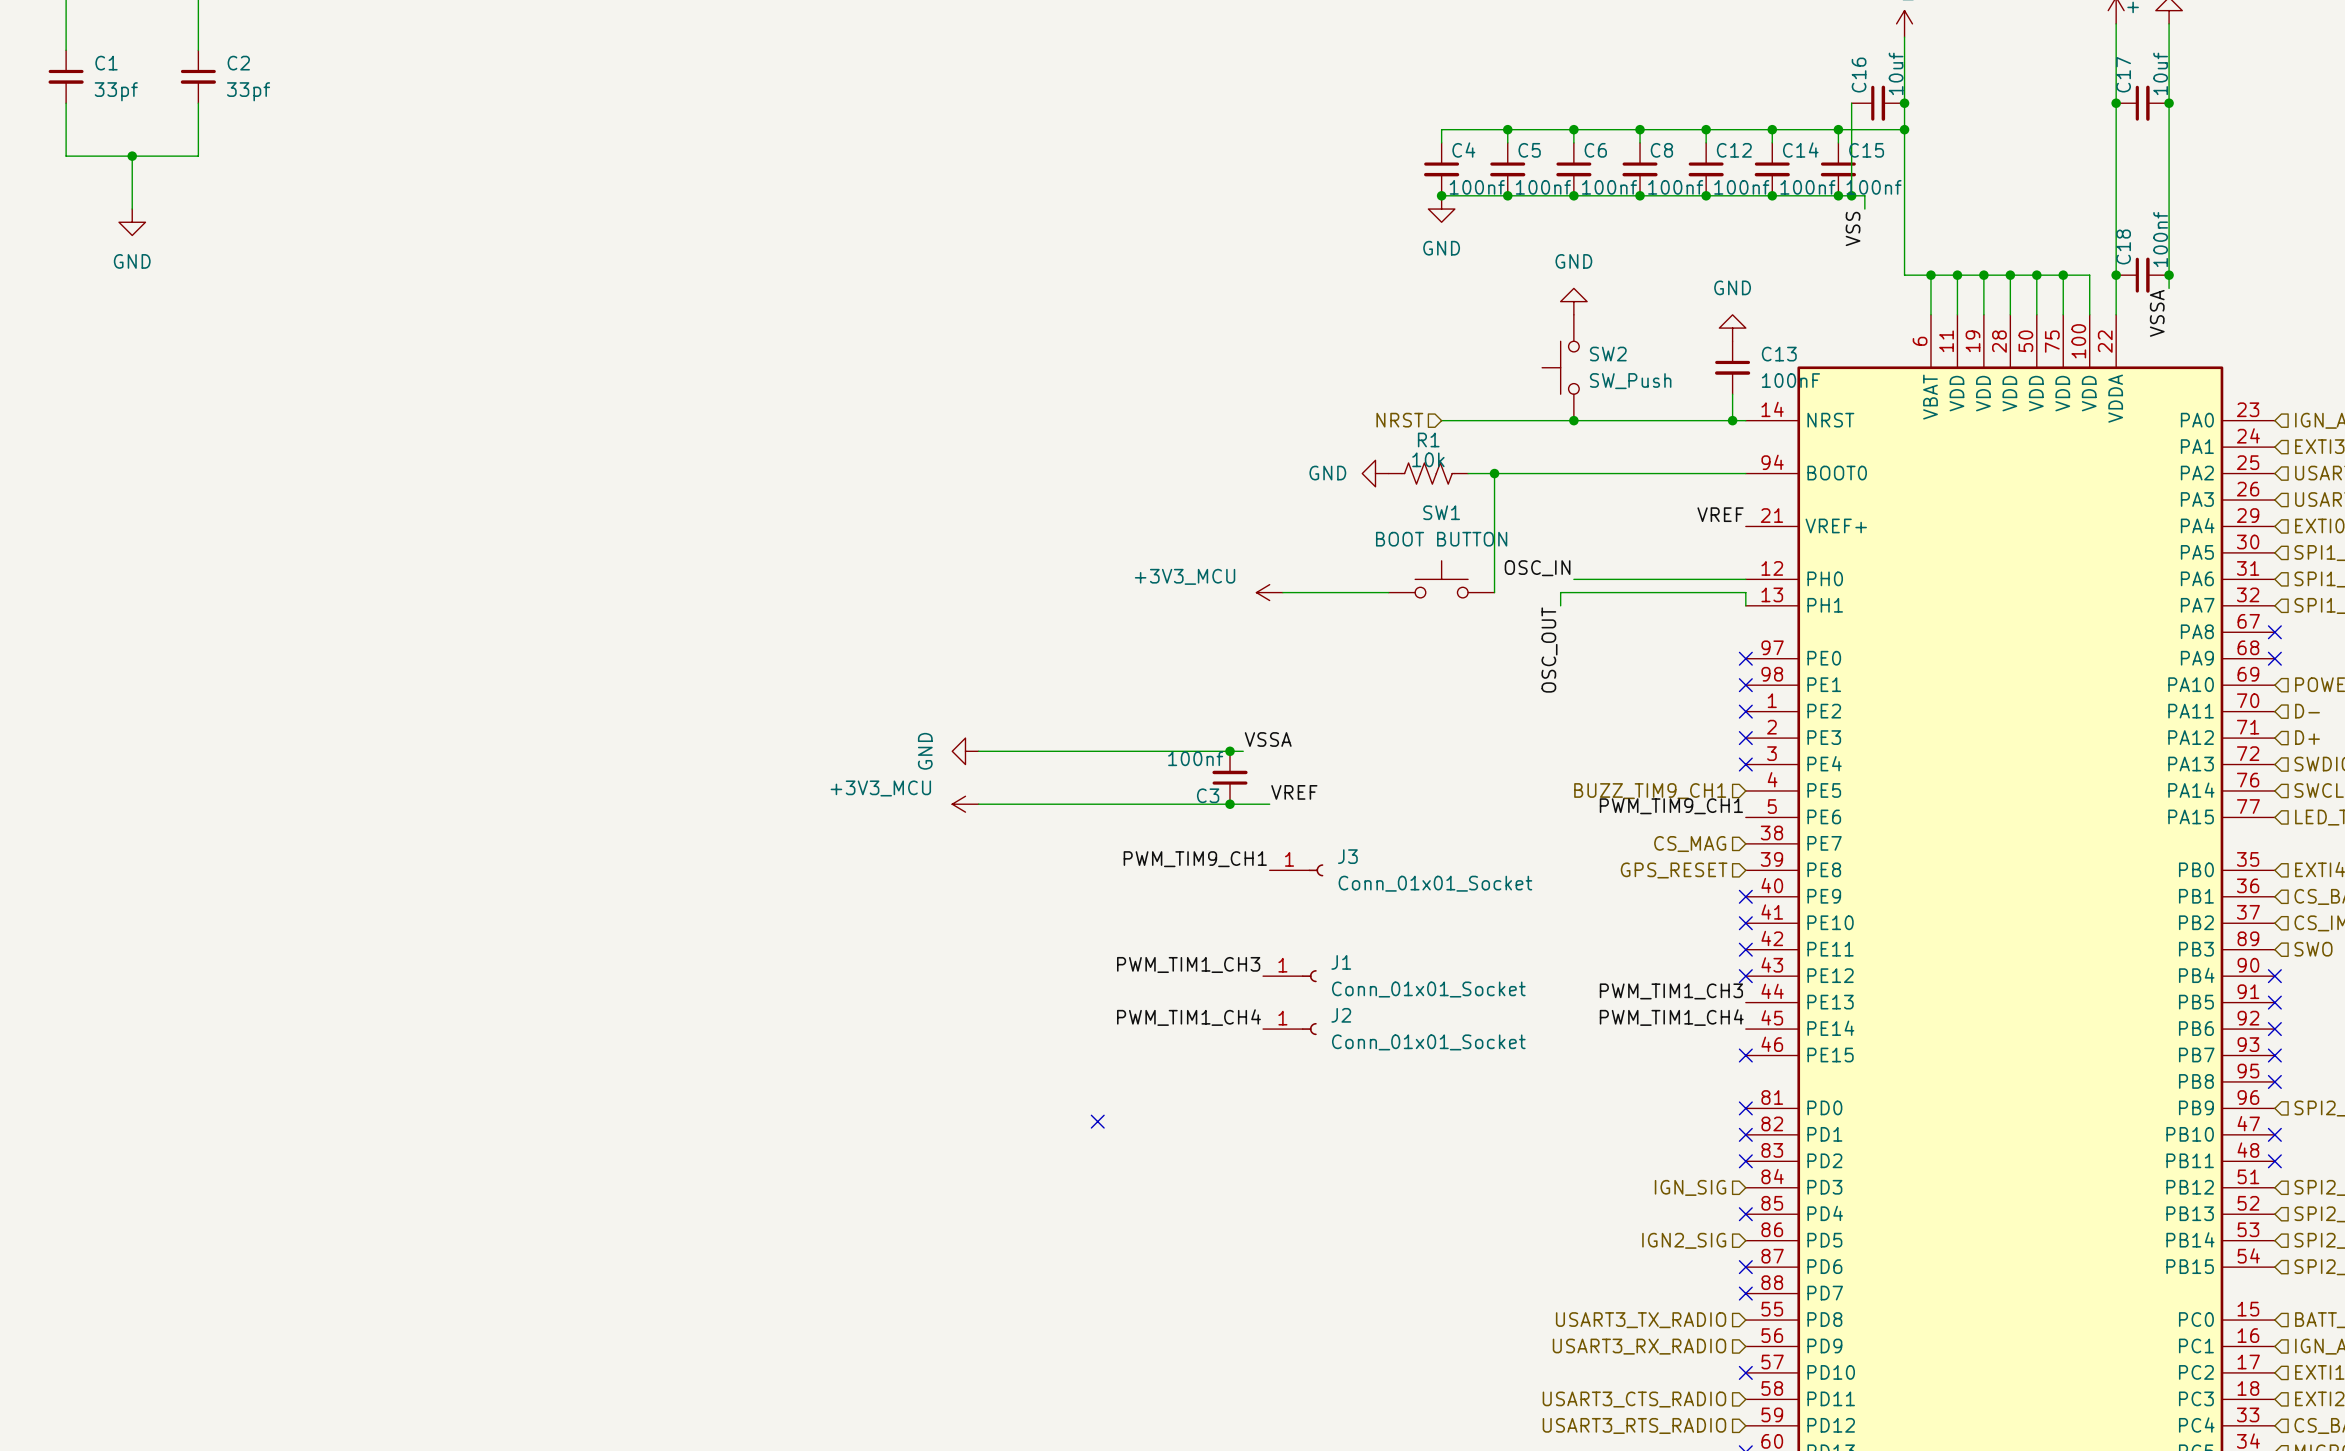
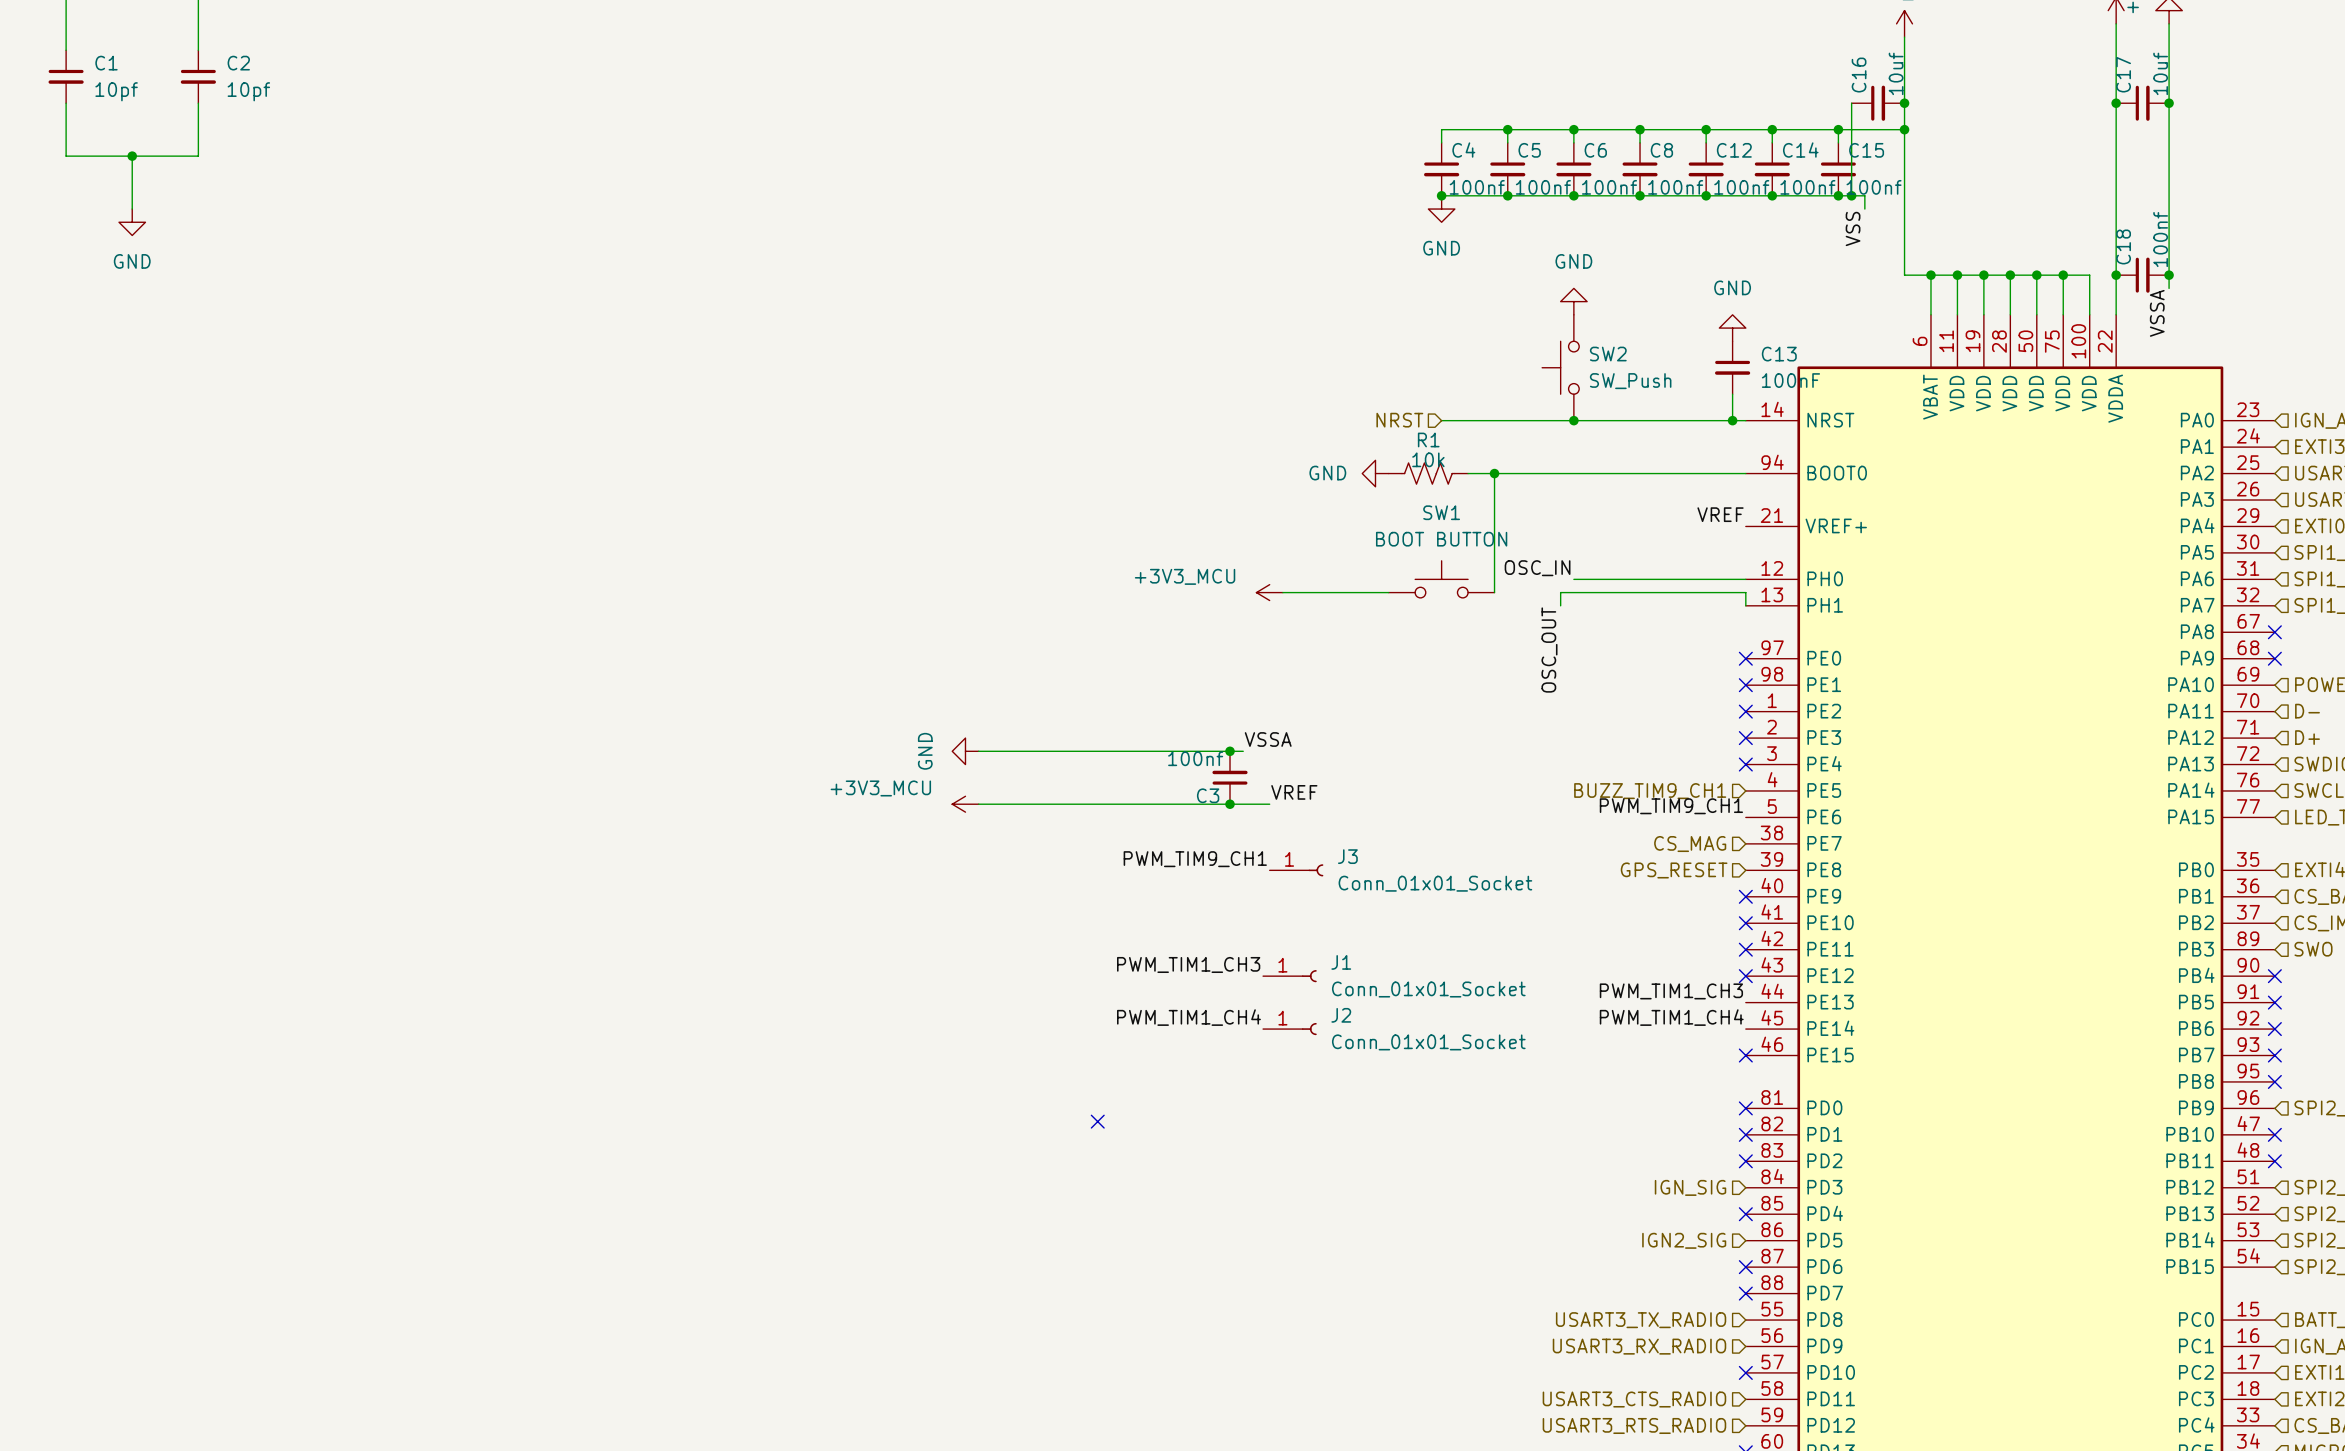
C1 value: 33pf (116, 91) -> 10pf (116, 91)
C2 value: 33pf (248, 91) -> 10pf (248, 91)

